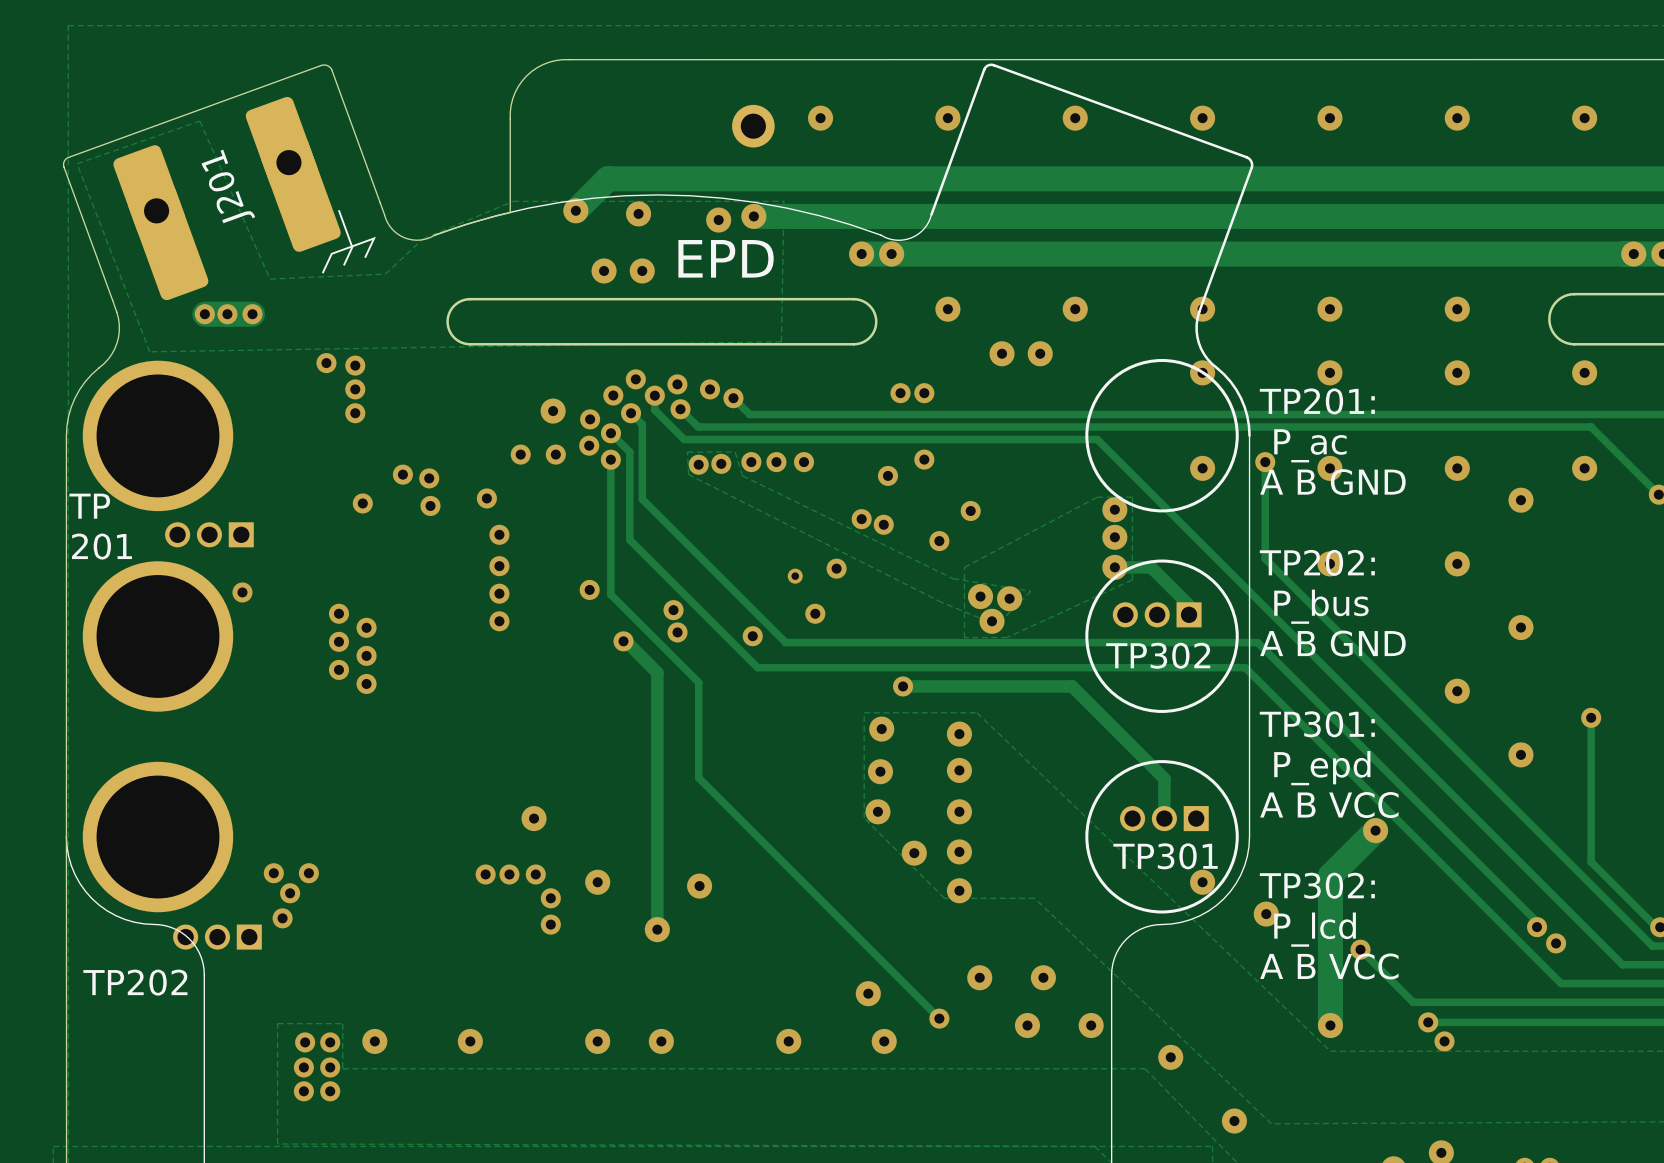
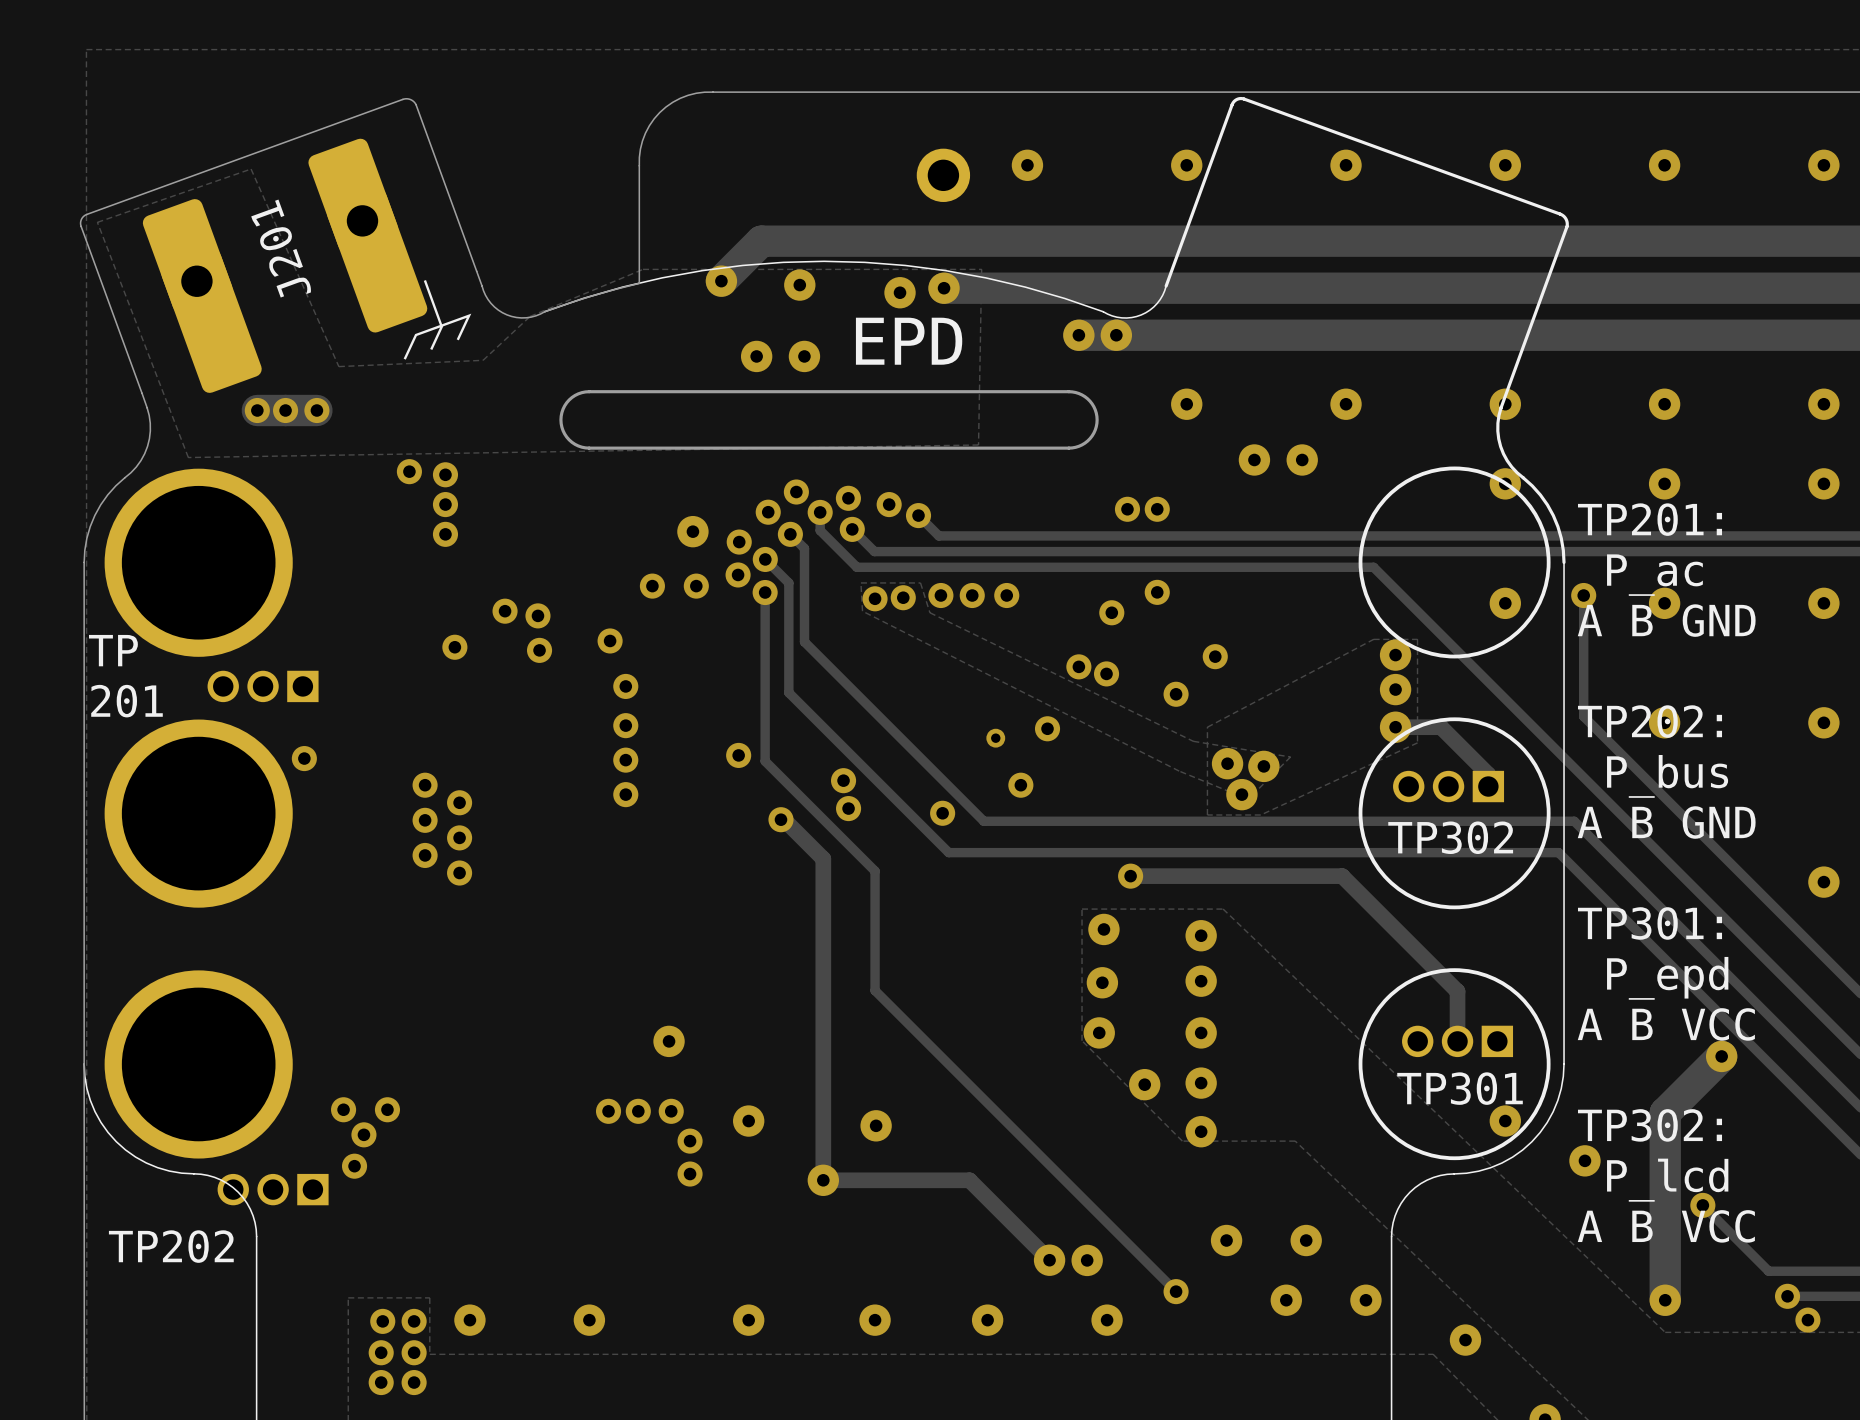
track: none -> (823, 1180) (969, 1180) (1049, 1260)
via: none -> (1049, 1260)
via position: (661, 1041) -> (875, 1320)

